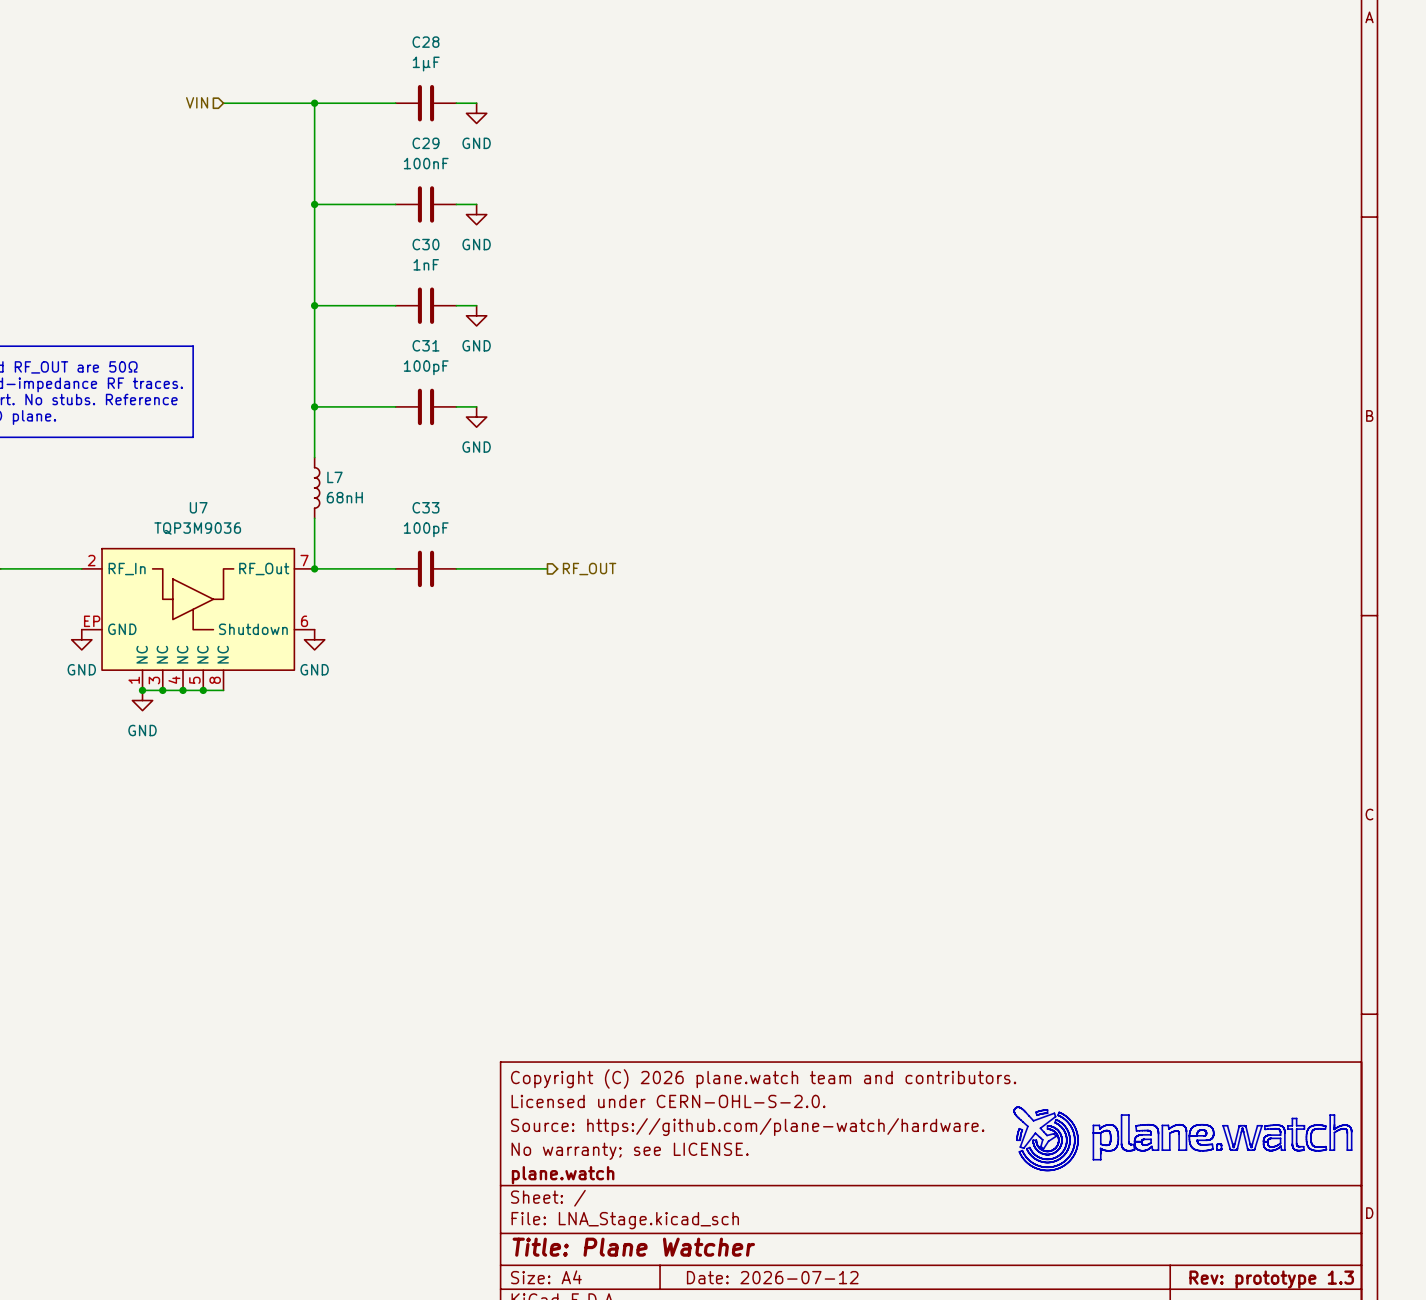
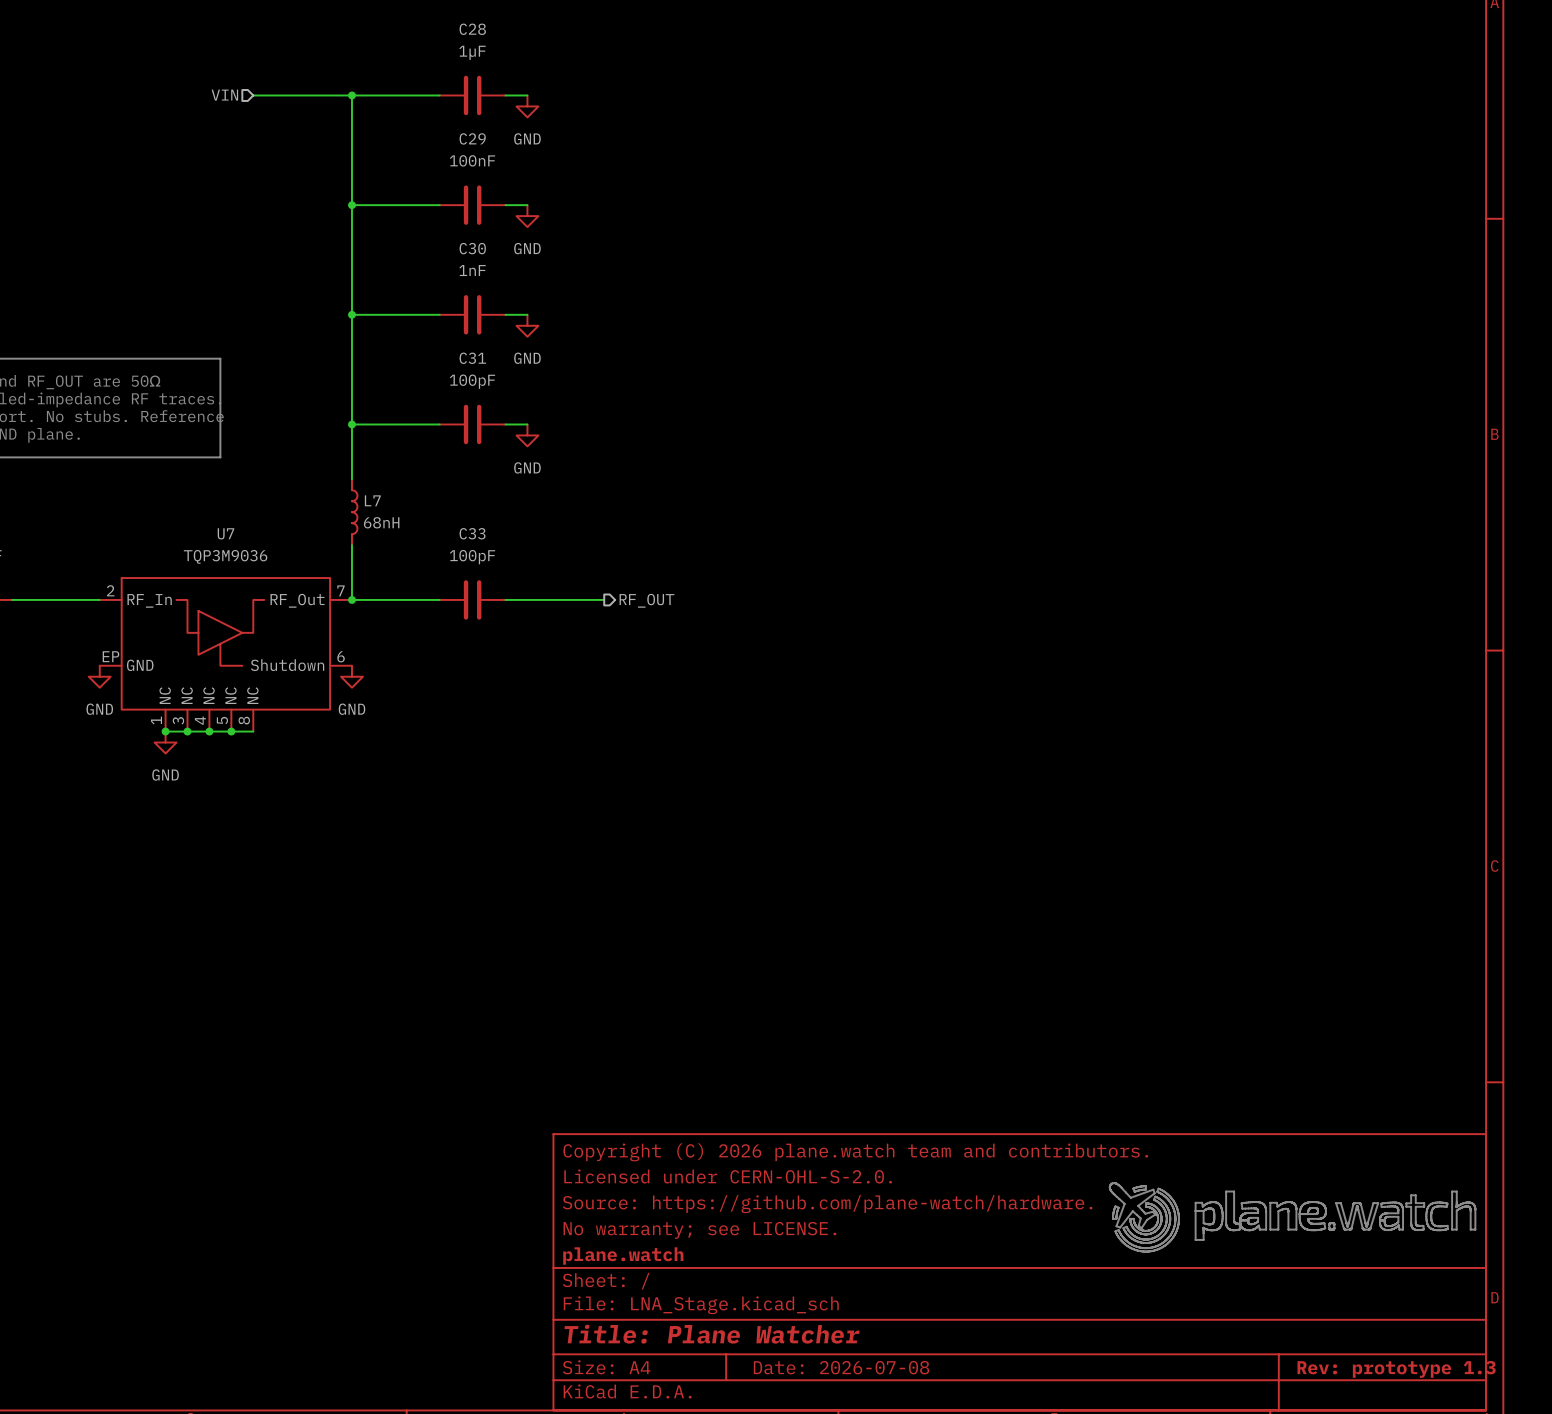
title block: Date: 2026-07-12 (772, 1277) -> Date: 2026-07-08 (841, 1367)

